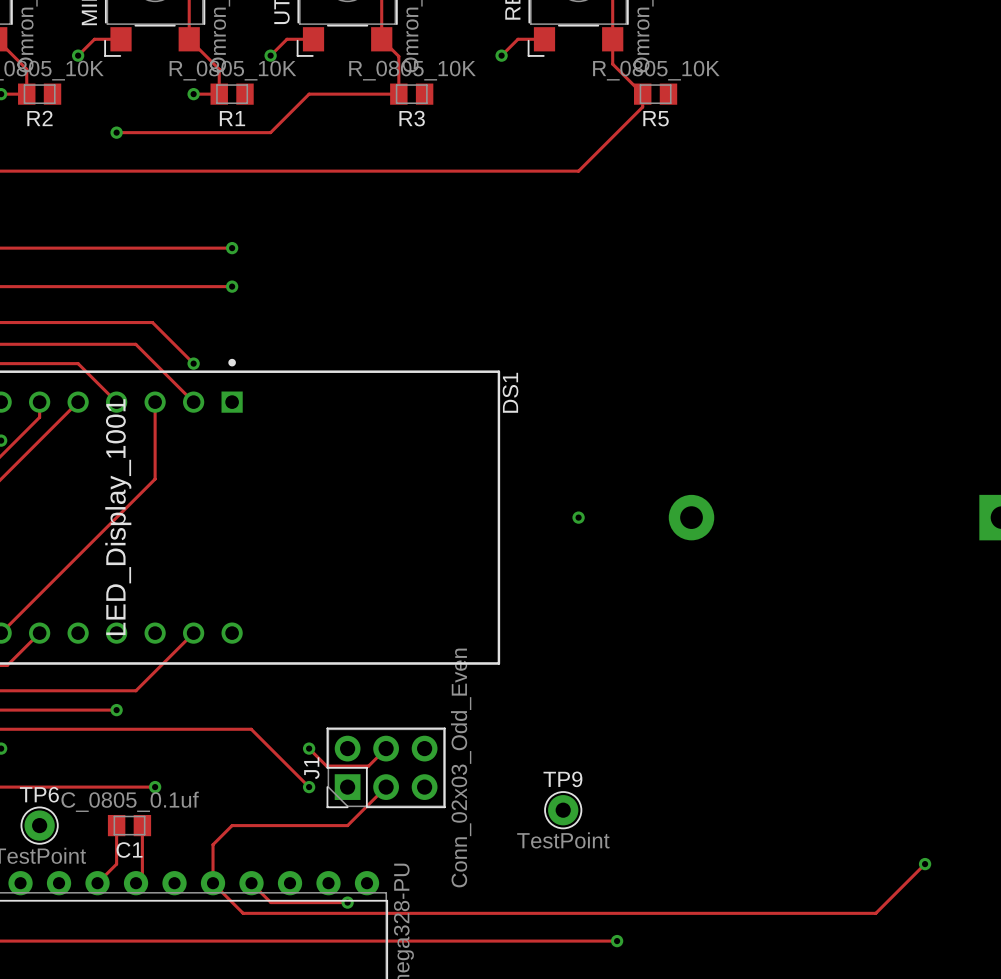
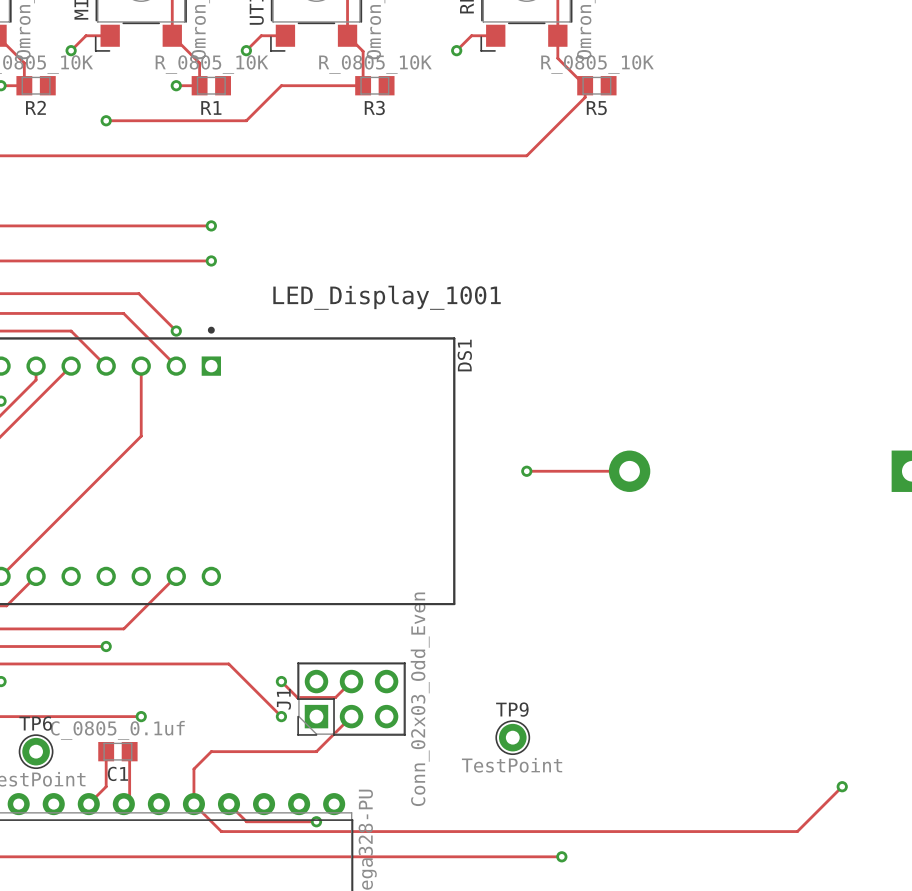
DS1 value rotation: 0° (118, 517) -> 90° clockwise (387, 297)
DS1 value position: LED_Display_1001 (118, 517) -> LED_Display_1001 (387, 297)
track: none -> (526, 471) (629, 471)

